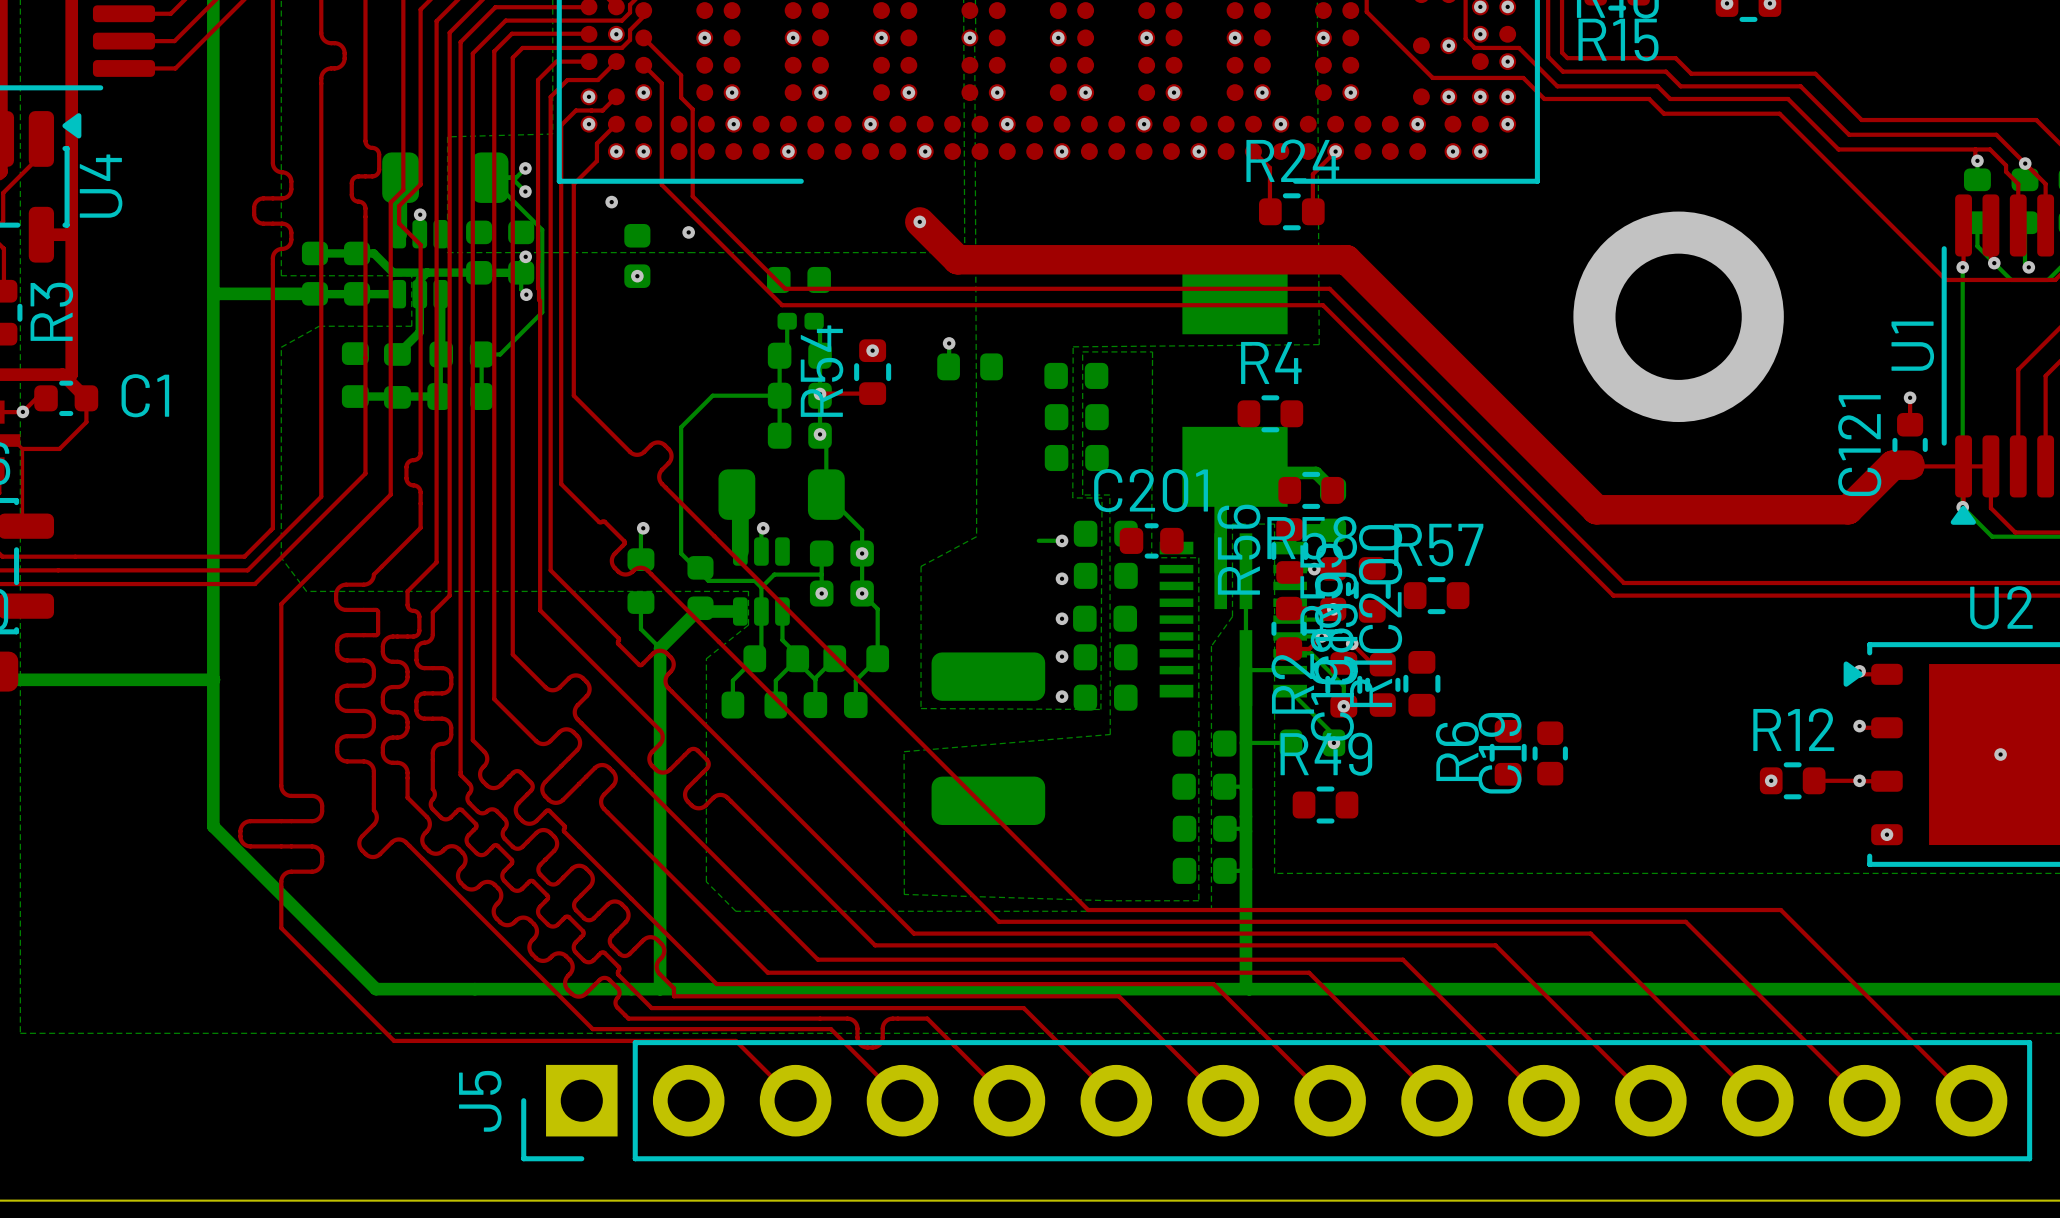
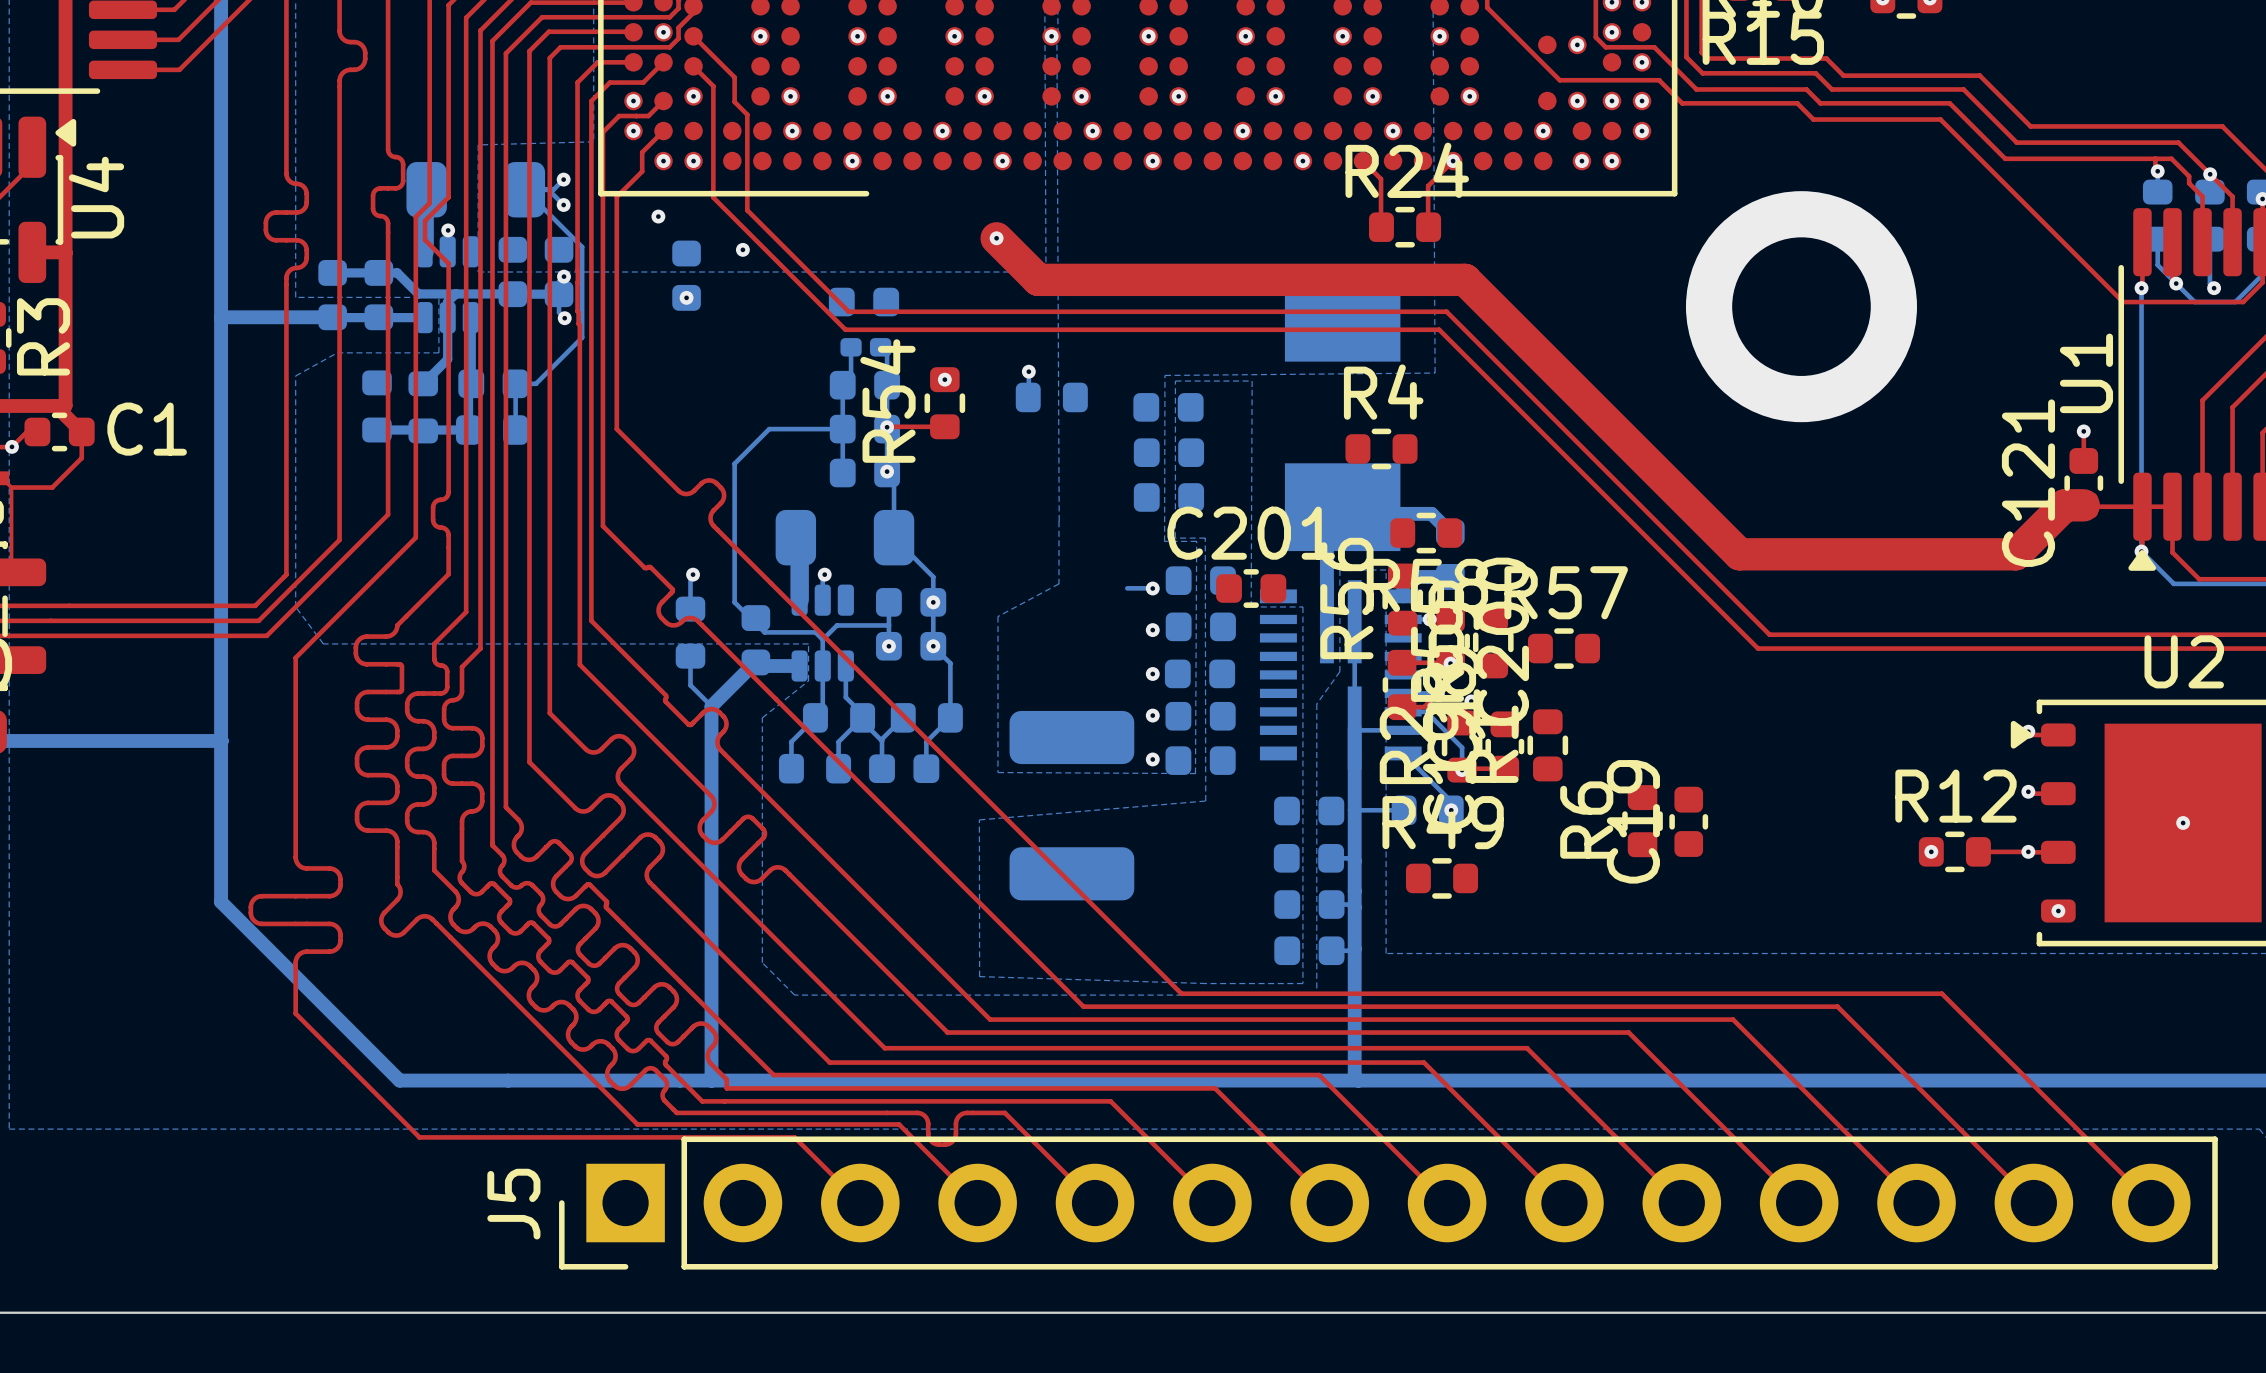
via position: (1678, 316) -> (1801, 306)

